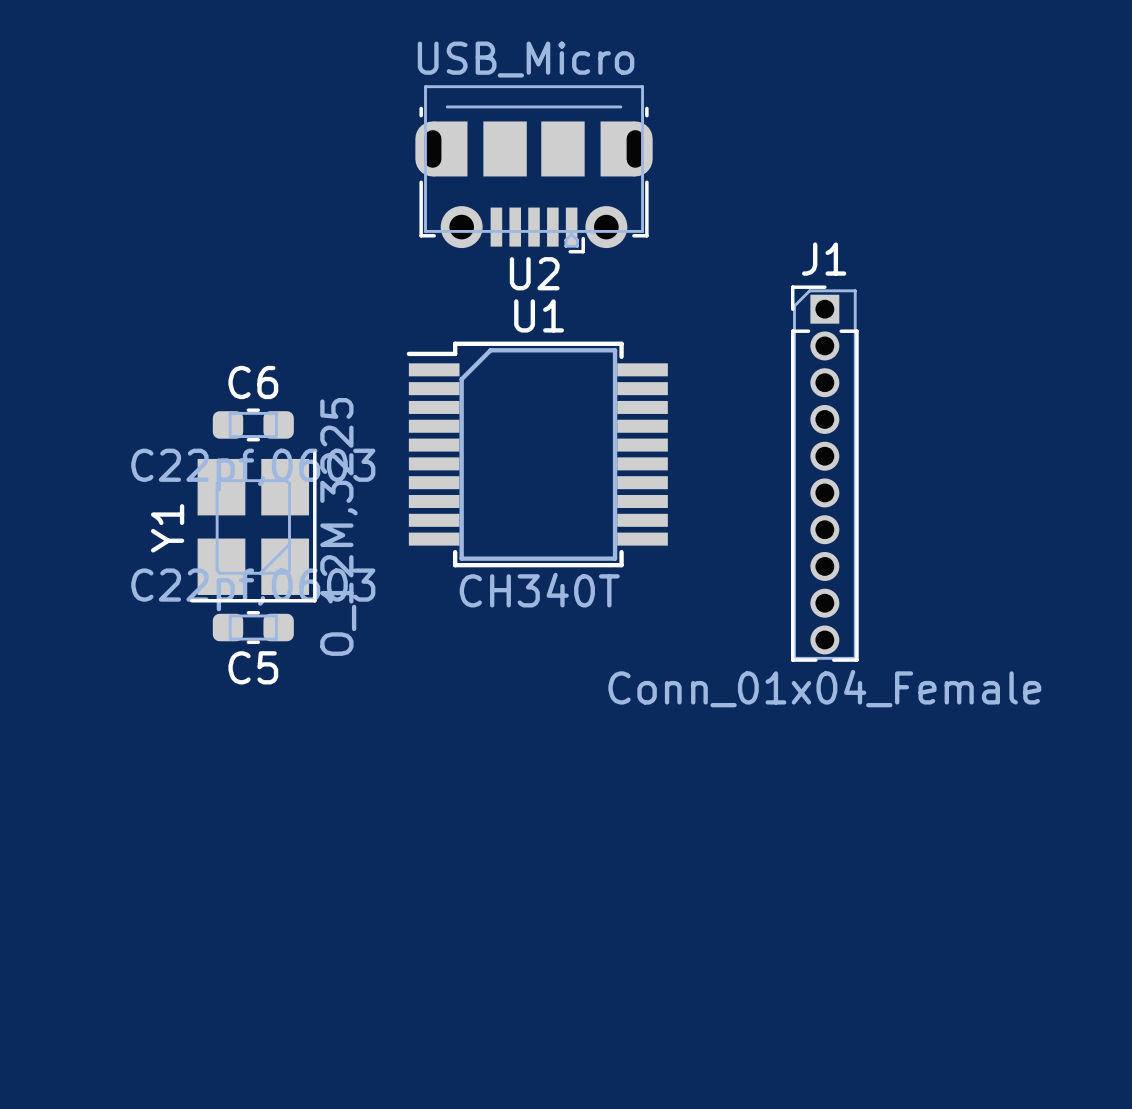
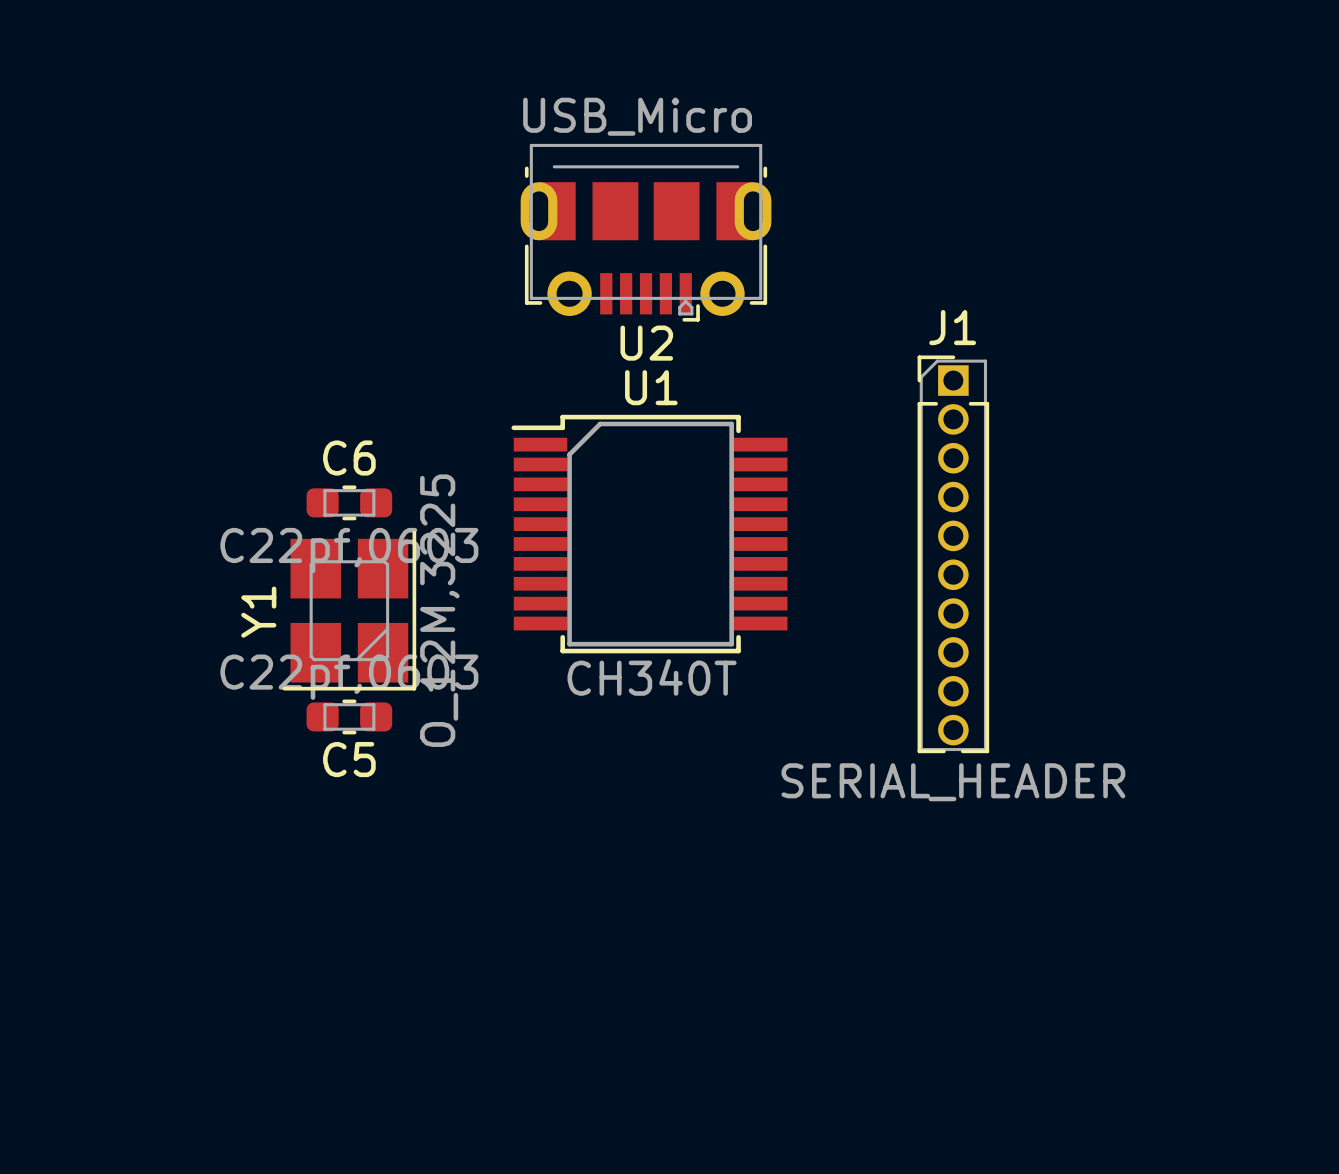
J1 value: Conn_01x04_Female (824, 688) -> SERIAL_HEADER (953, 782)

